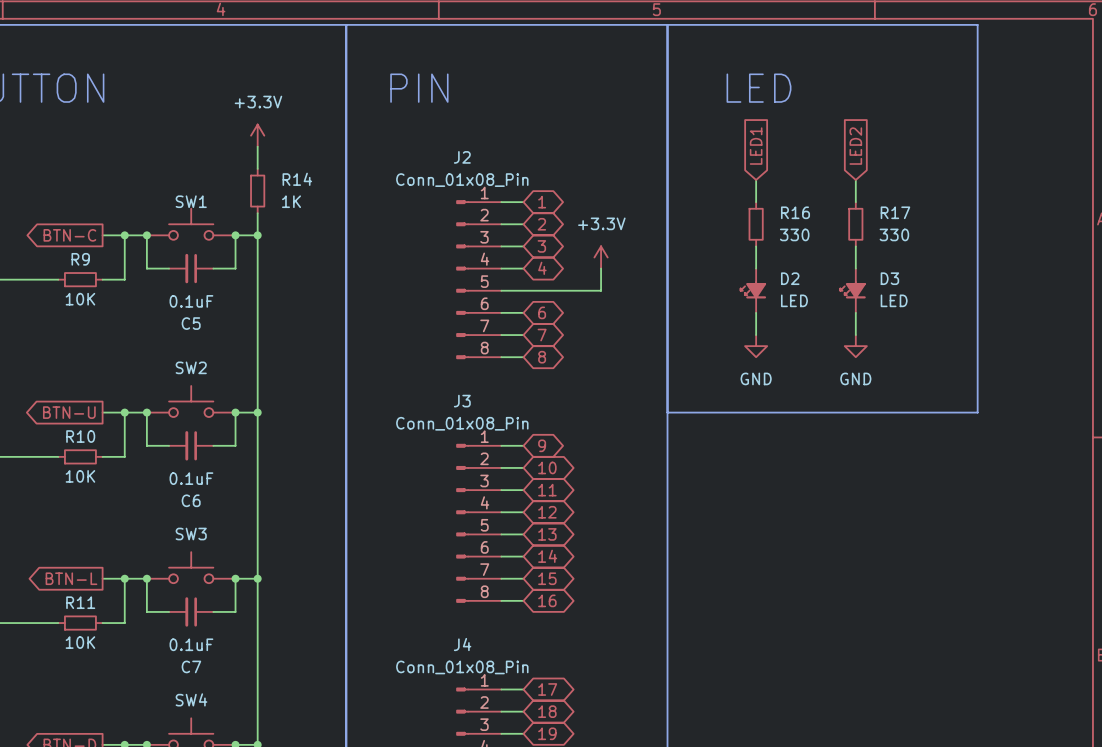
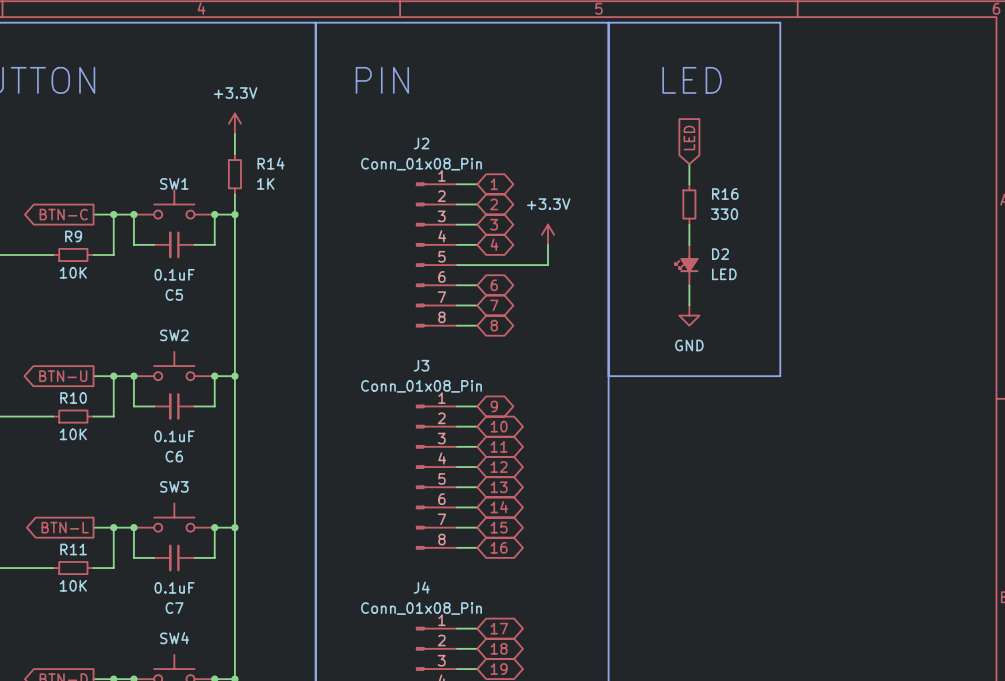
line: (855, 24) (977, 24) (977, 412) (855, 412) -> (780, 22) (780, 376)
global label: LED1 (756, 146) -> LED (689, 137)
global label: LED2 (855, 146) -> none
R17: 330 (855, 224) -> none
D3: LED (853, 290) -> none
power symbol: GND (855, 346) -> none

